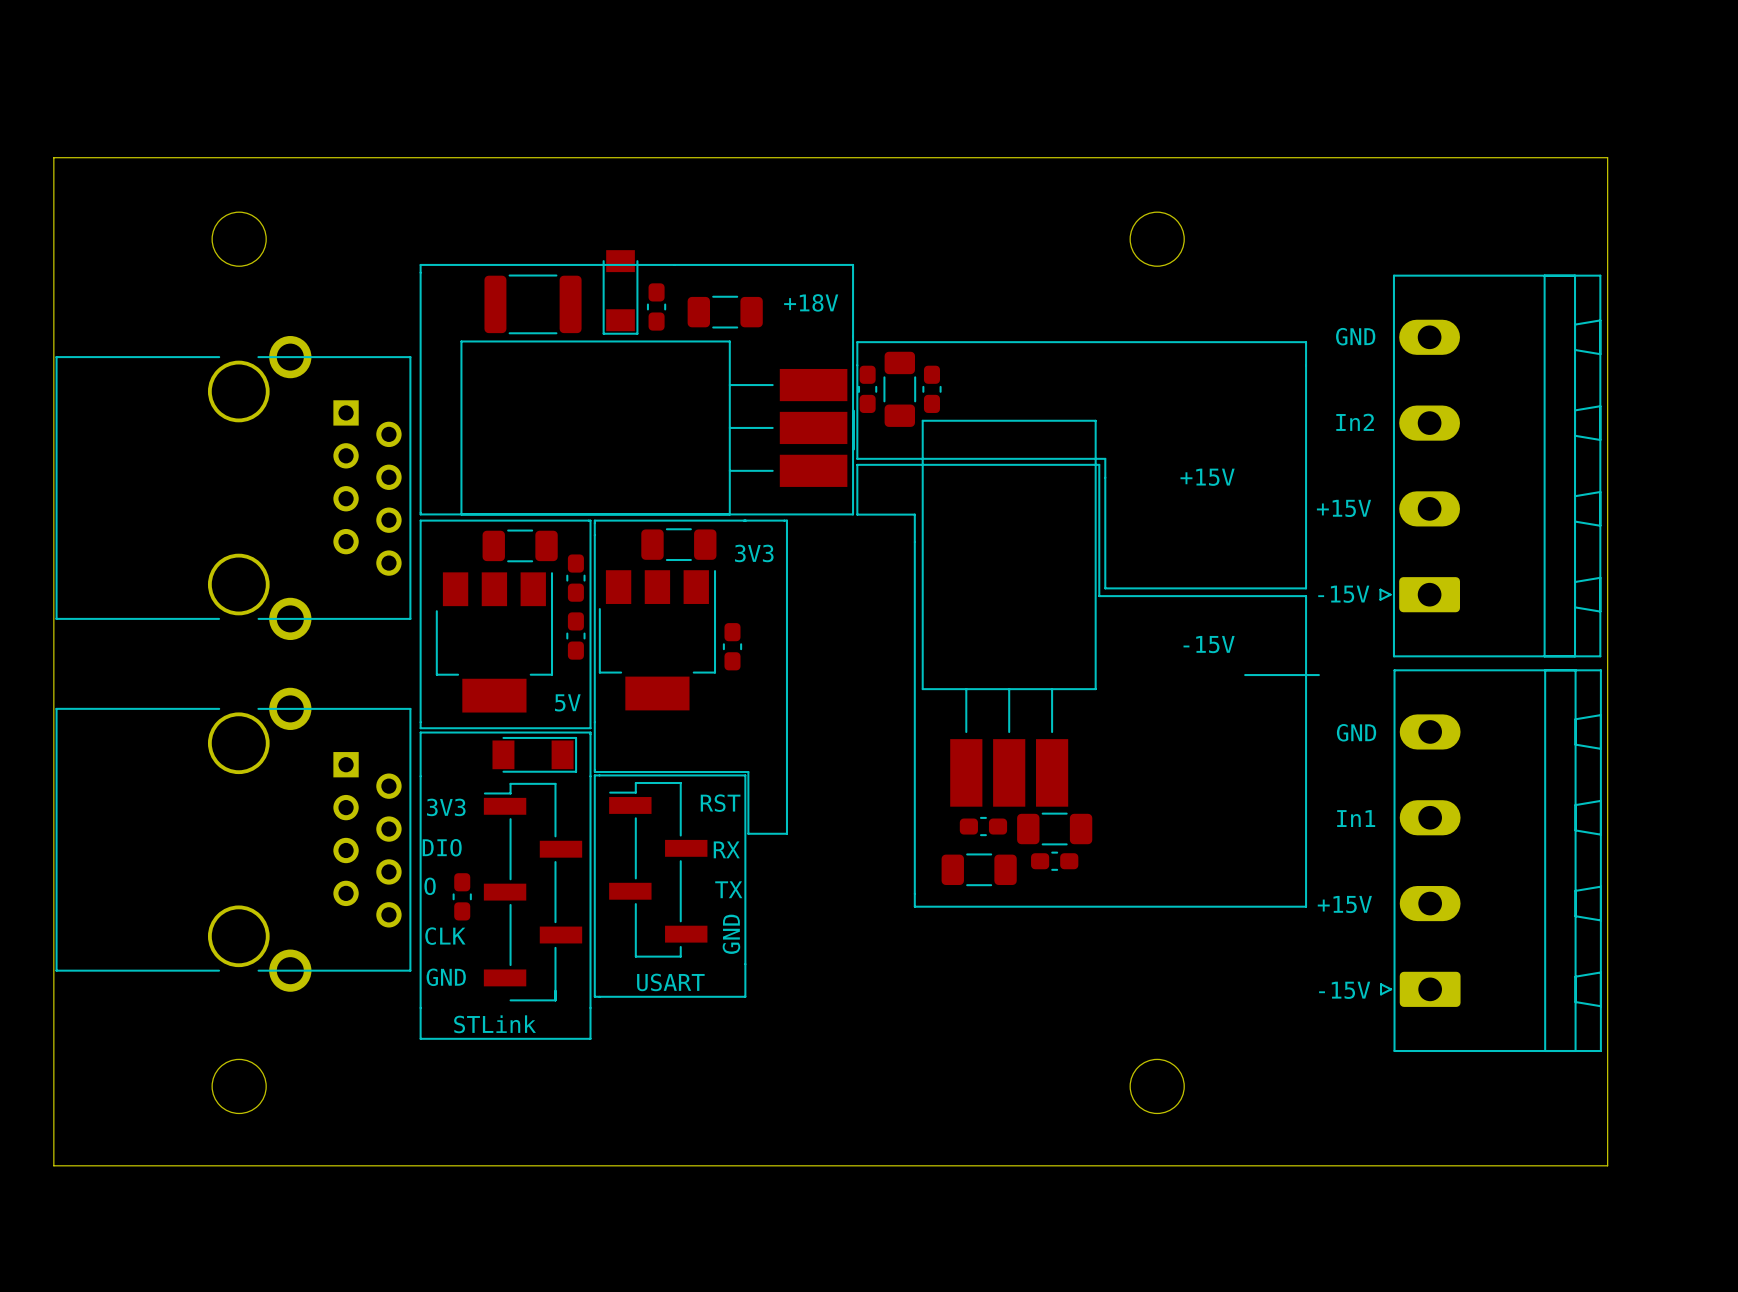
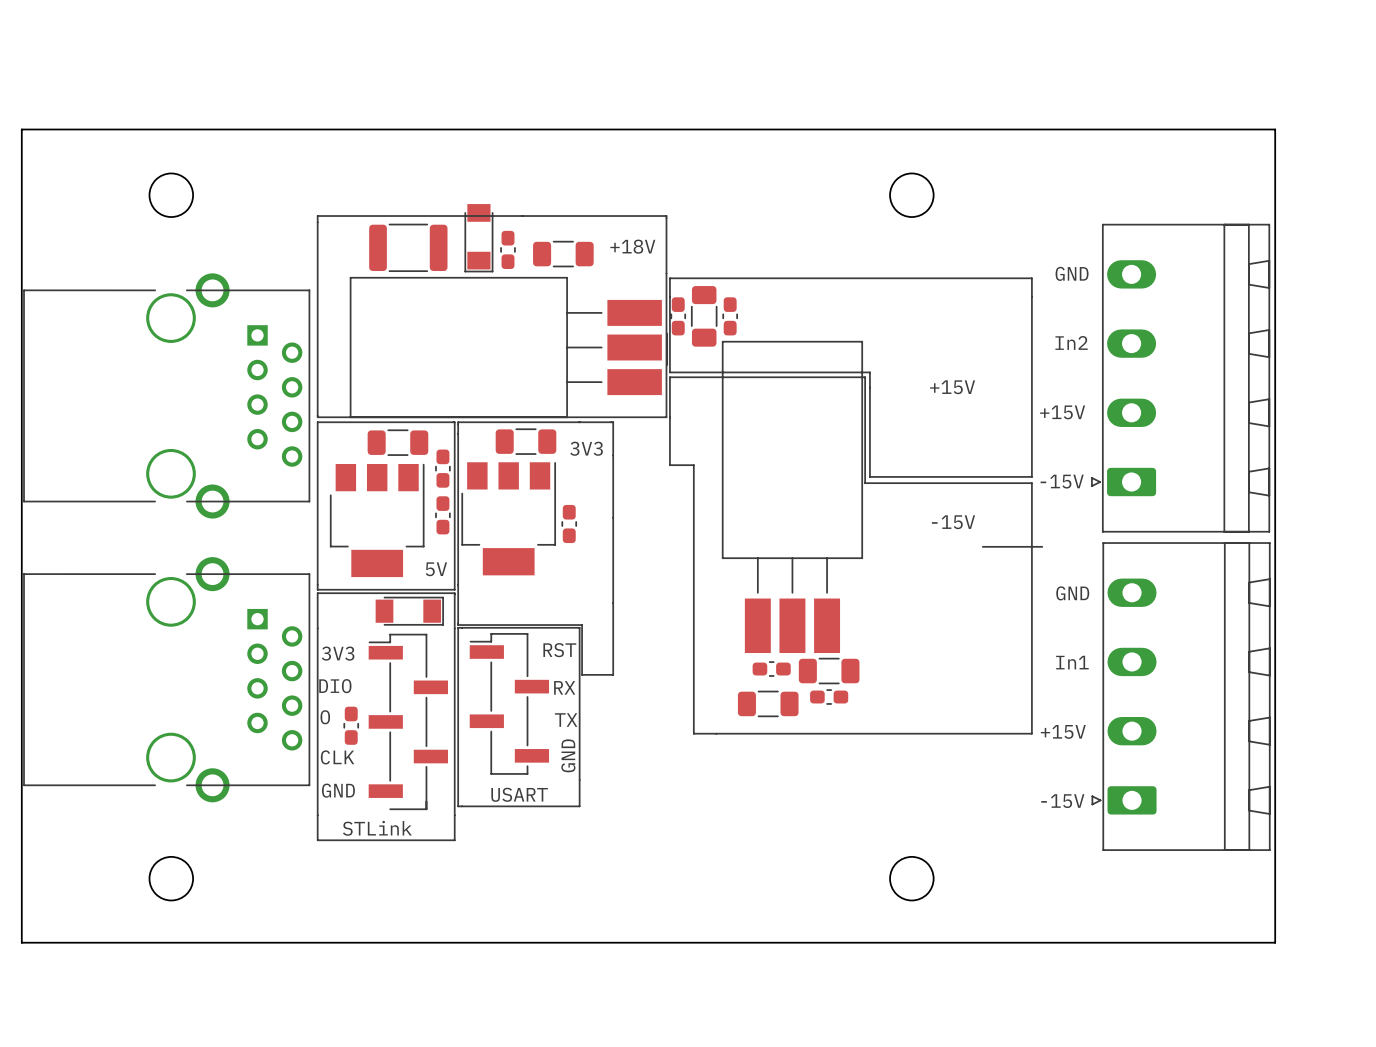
line: (857, 514) (914, 514) (914, 906) -> (669, 417) (669, 465) (693, 465) (693, 733) (716, 733)

